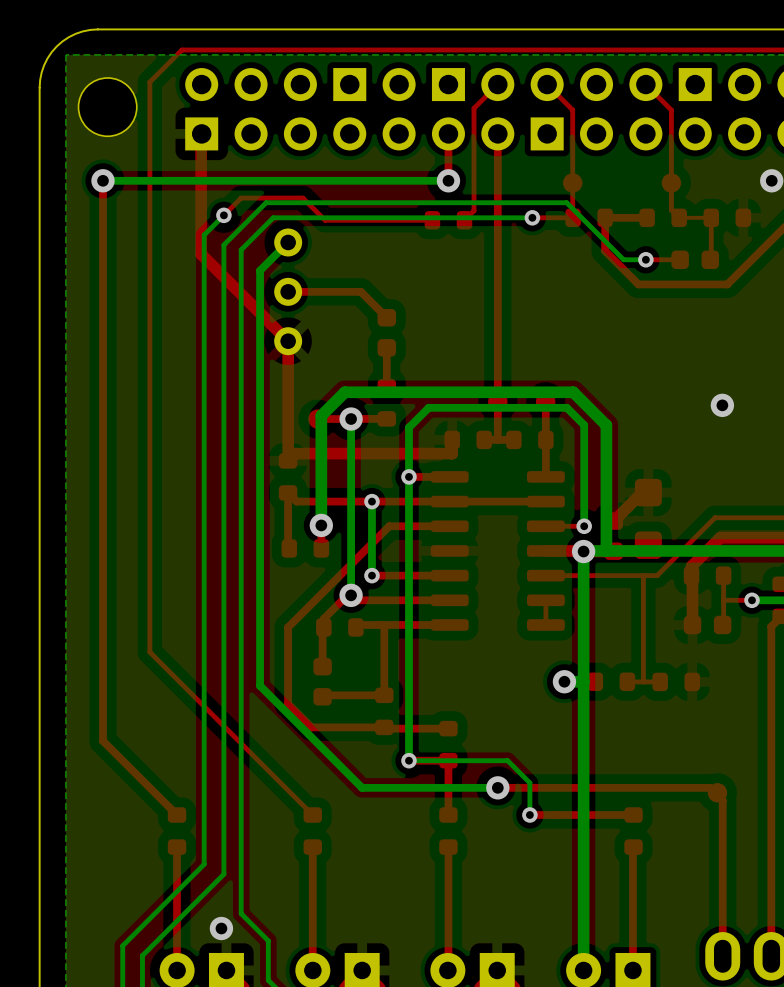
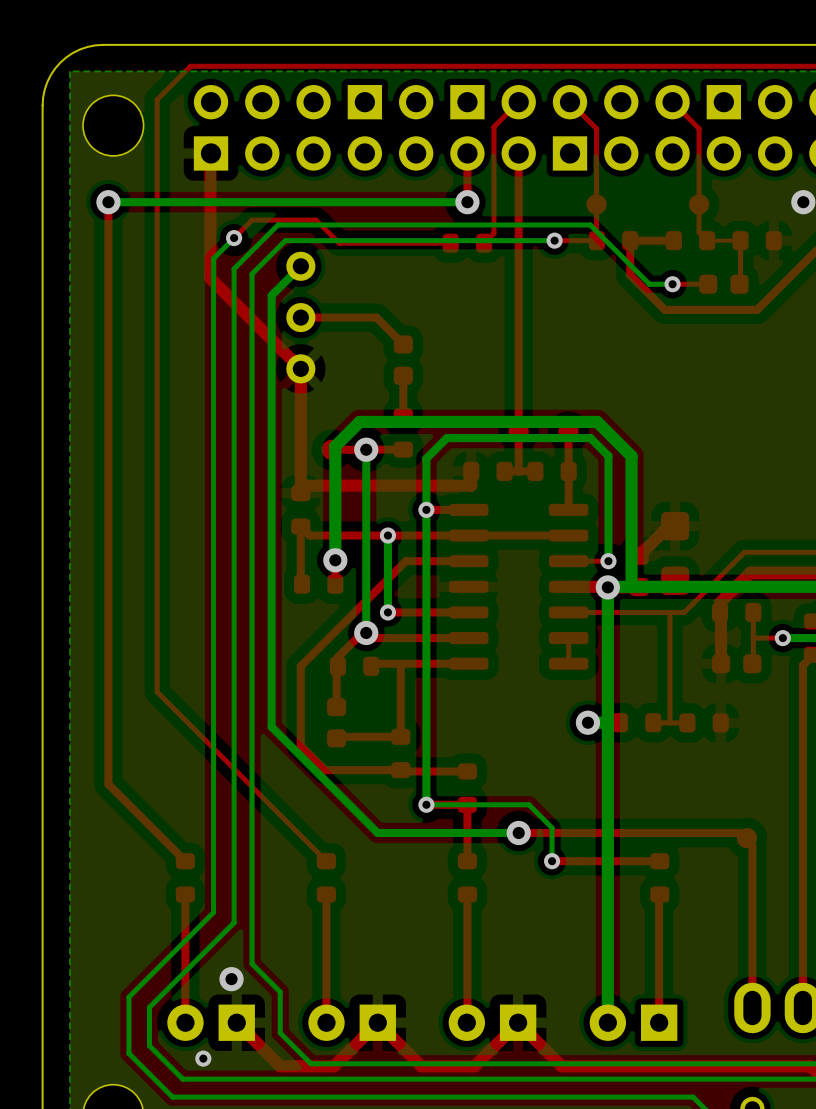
via: (722, 405) -> none

